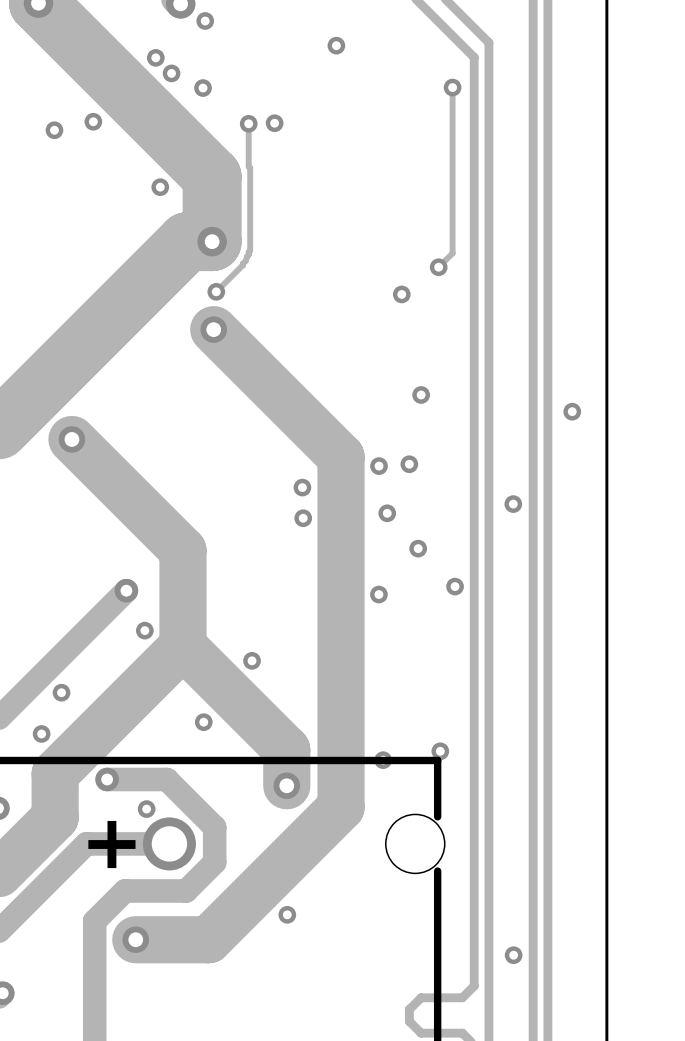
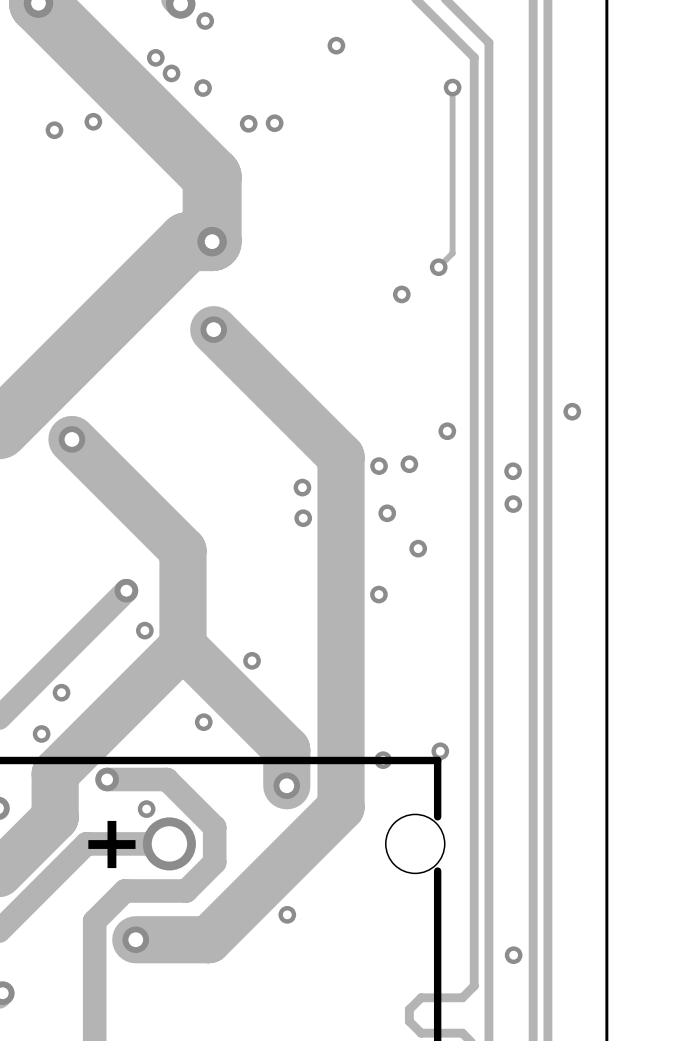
track: (248, 123) (250, 250) (242, 265) (216, 291) -> none
via: (160, 187) -> none
via: (216, 291) -> none
via position: (421, 394) -> (447, 431)
via: none -> (513, 471)
via: (455, 586) -> none

